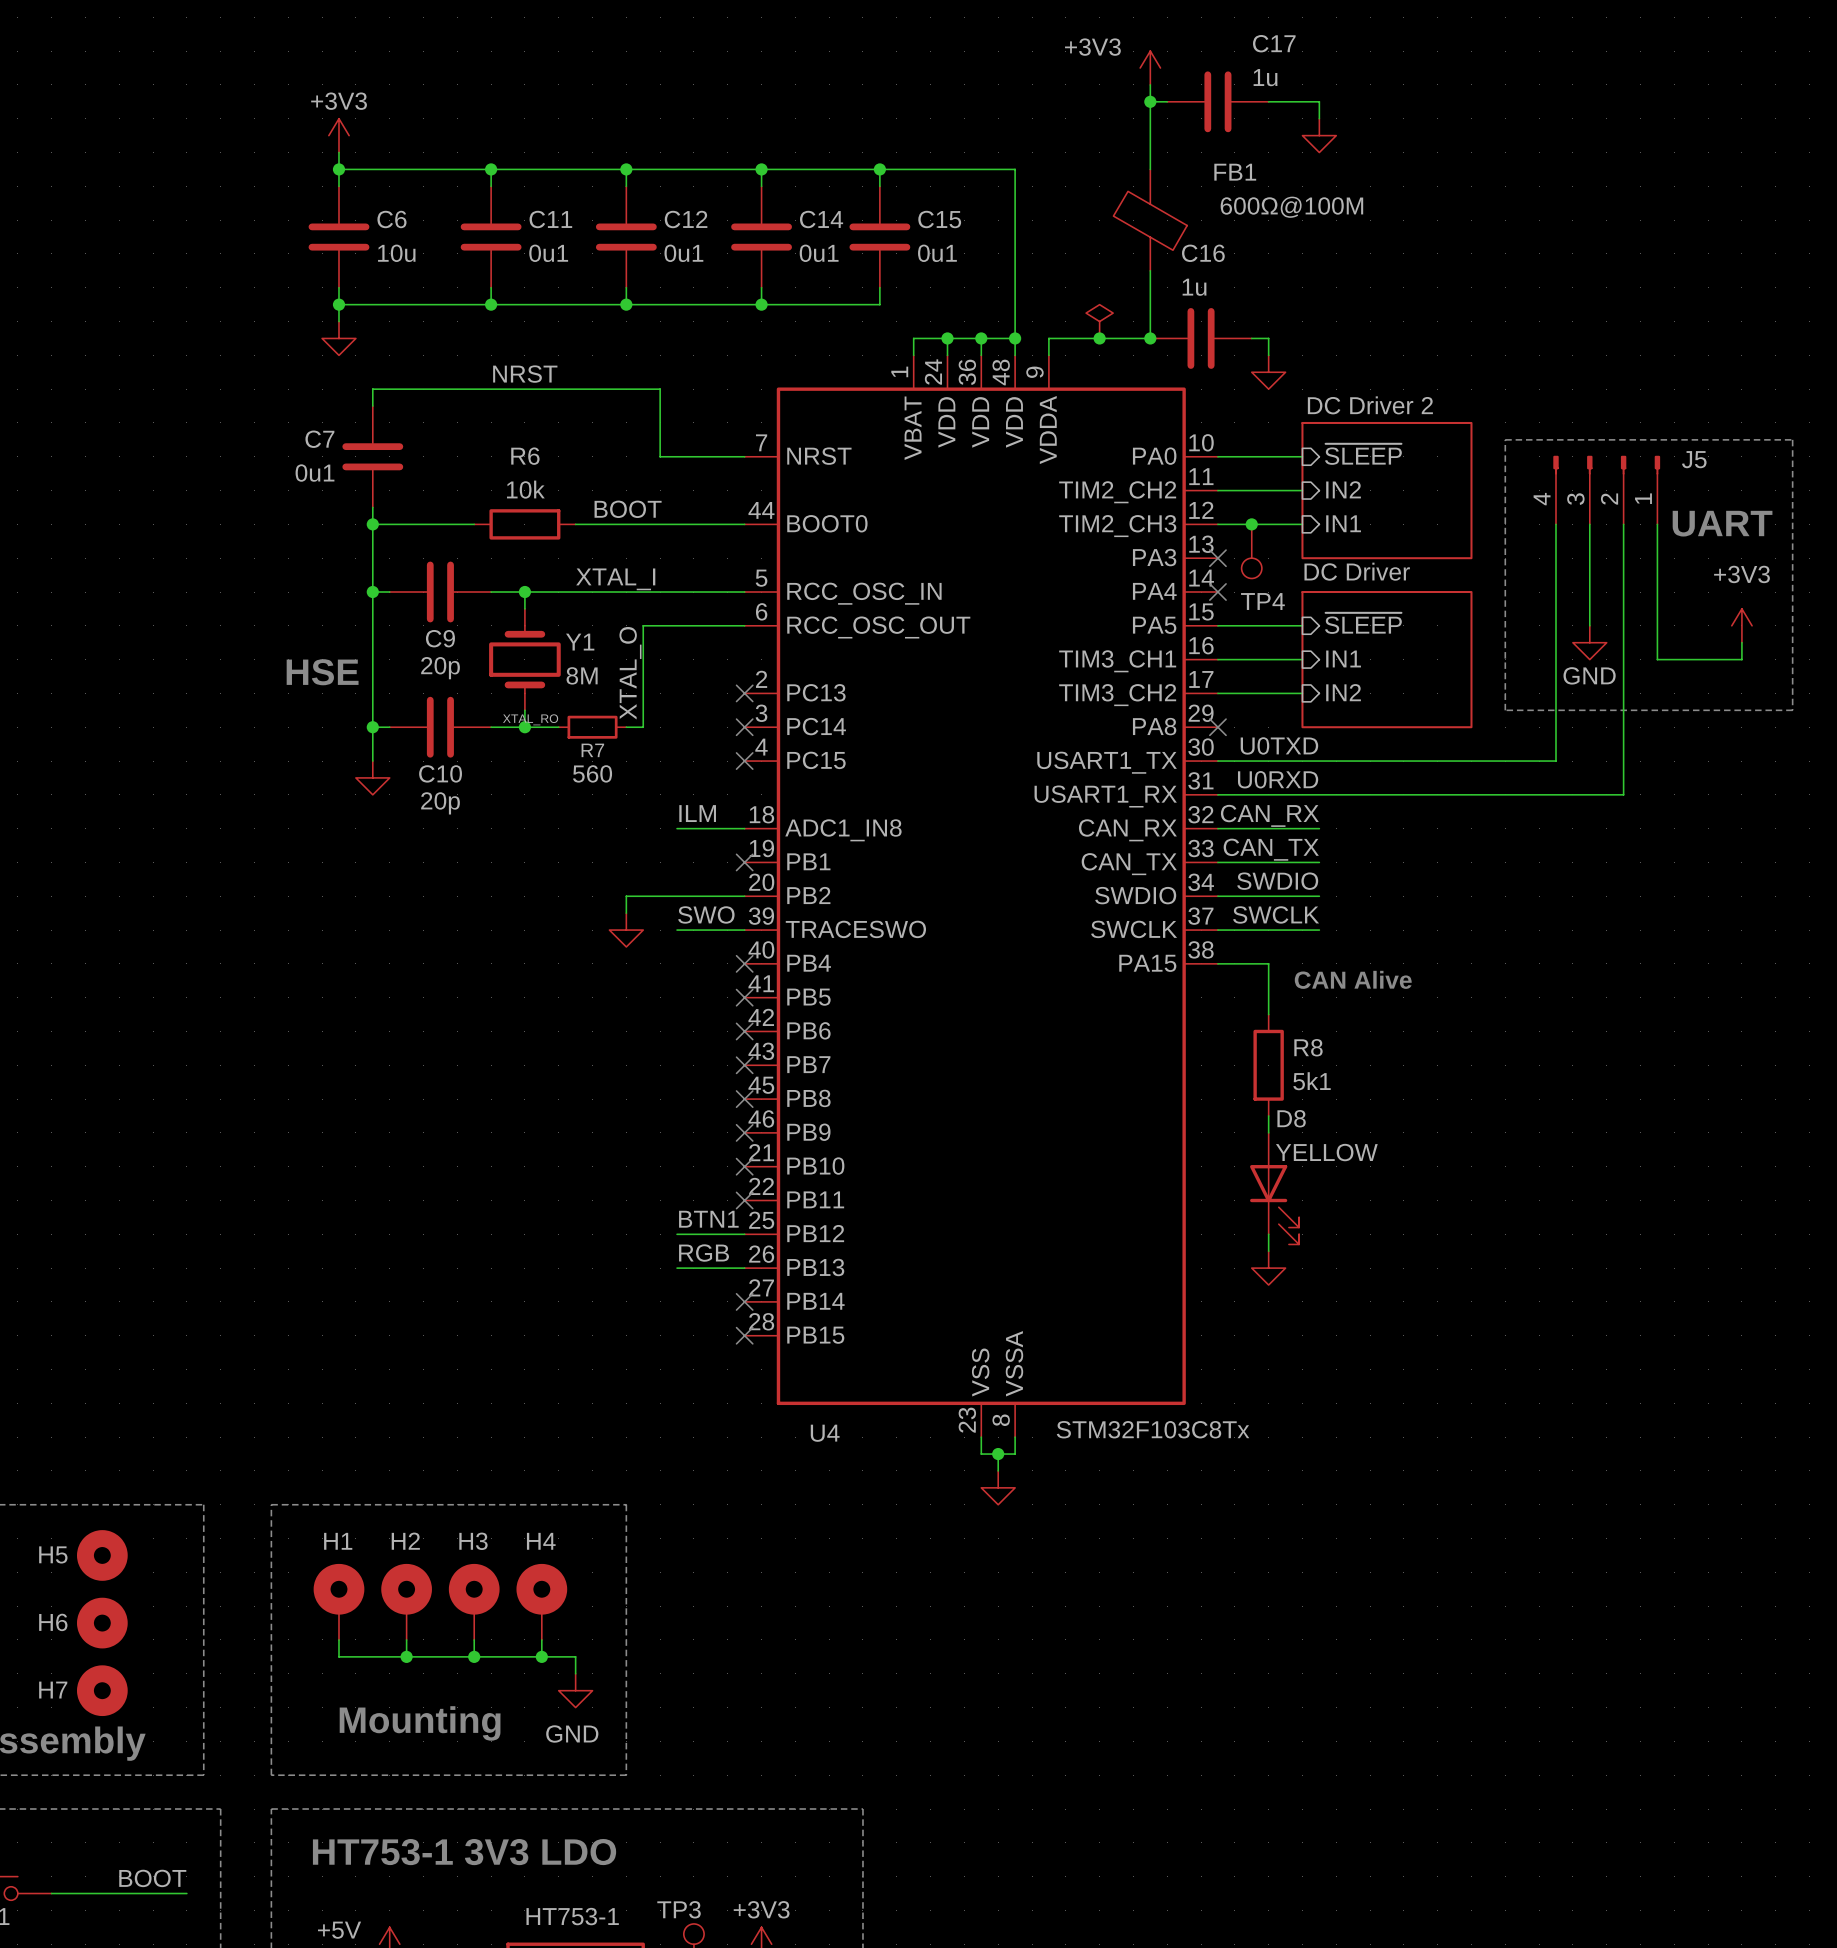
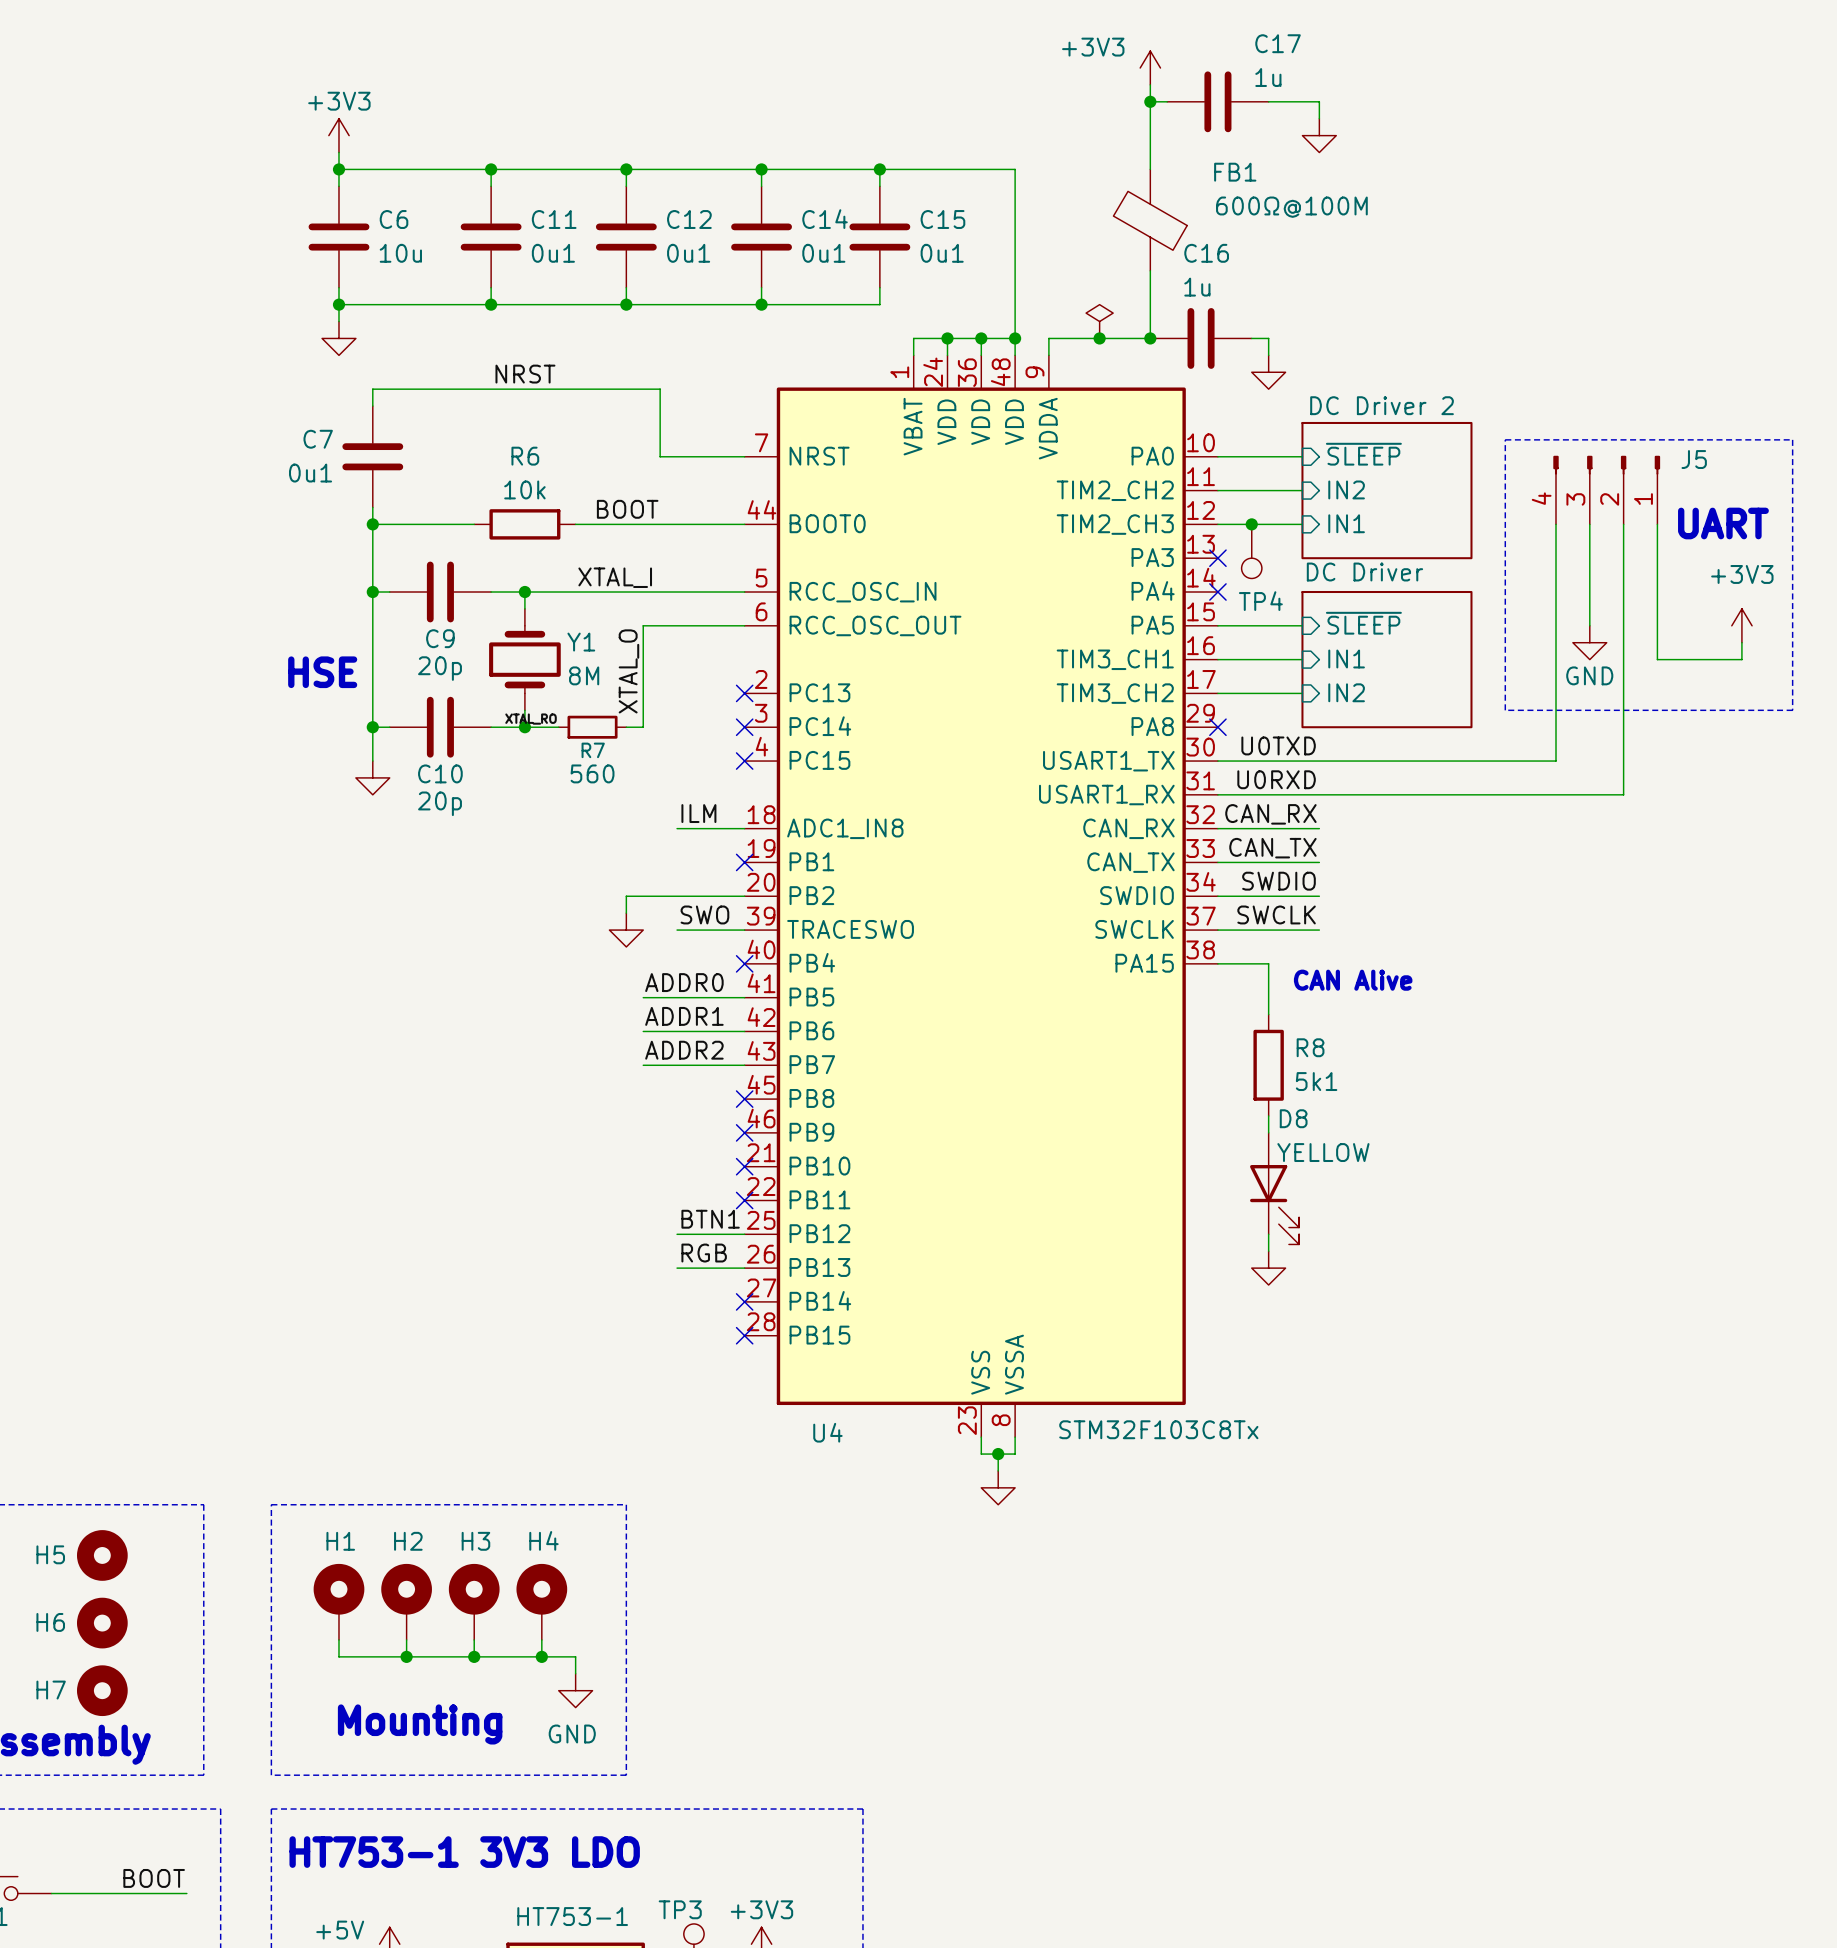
label: none -> ADDR0 (684, 982)
wire: none -> (643, 997) (744, 997)
no-connect mark: (744, 997) -> none
label: none -> ADDR1 (684, 1016)
wire: none -> (643, 1031) (744, 1031)
no-connect mark: (744, 1031) -> none
label: none -> ADDR2 (684, 1050)
wire: none -> (643, 1065) (744, 1065)
no-connect mark: (744, 1065) -> none

